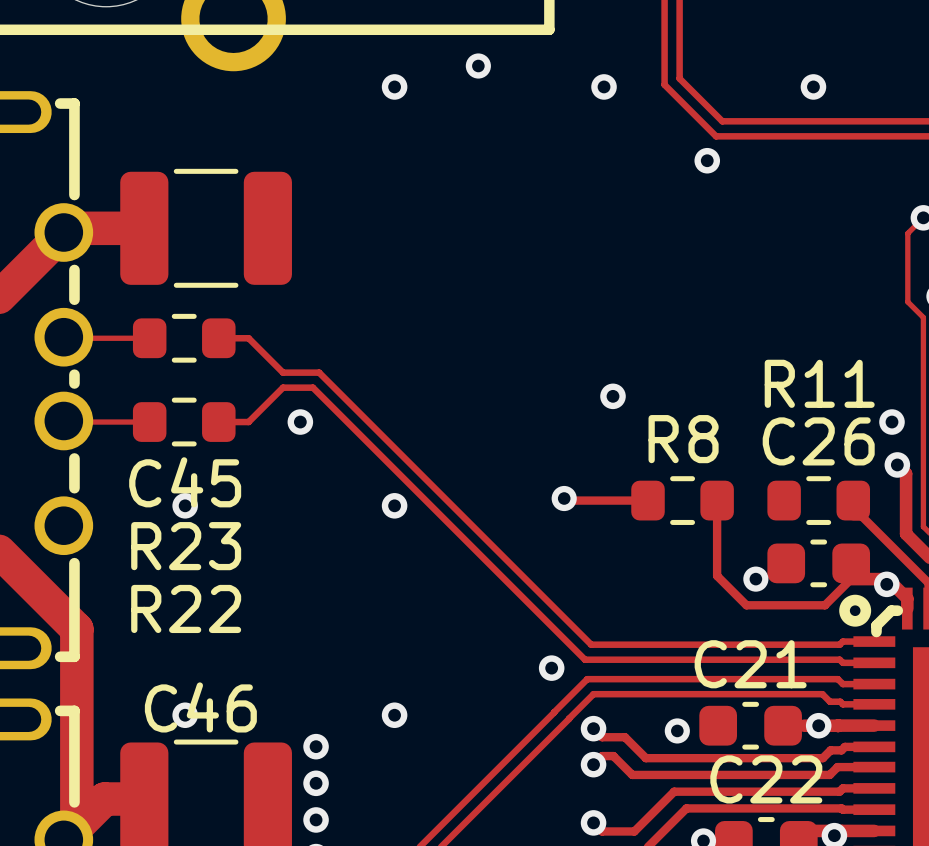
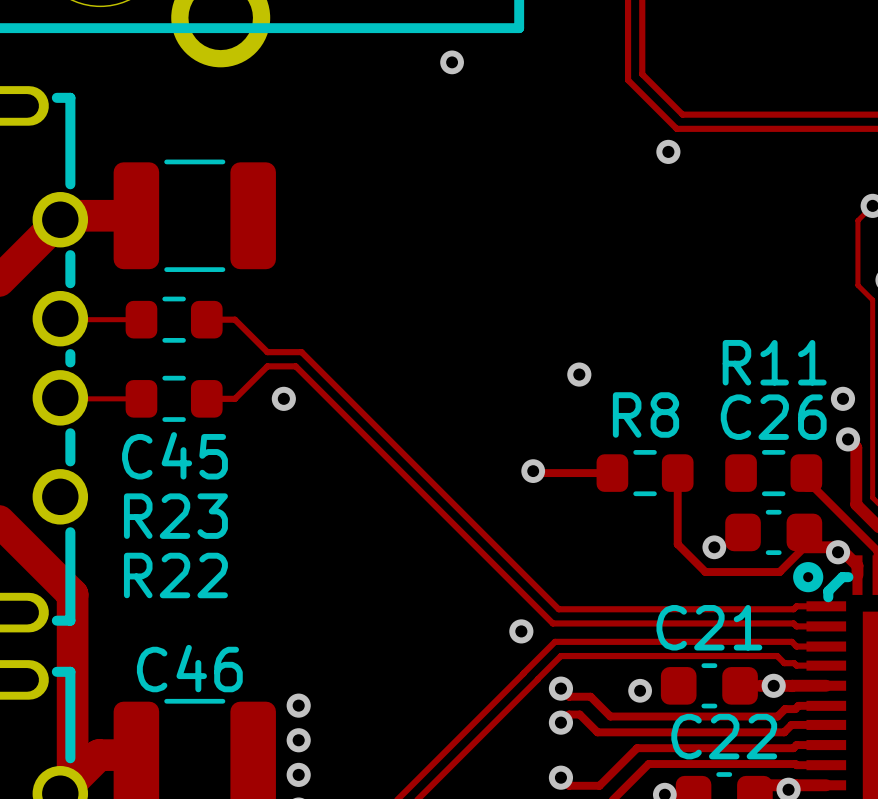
via: (394, 86) -> none
via: (604, 86) -> none
via: (813, 86) -> none
via: (185, 505) -> none
via: (394, 505) -> none
via: (185, 715) -> none
via: (394, 715) -> none

